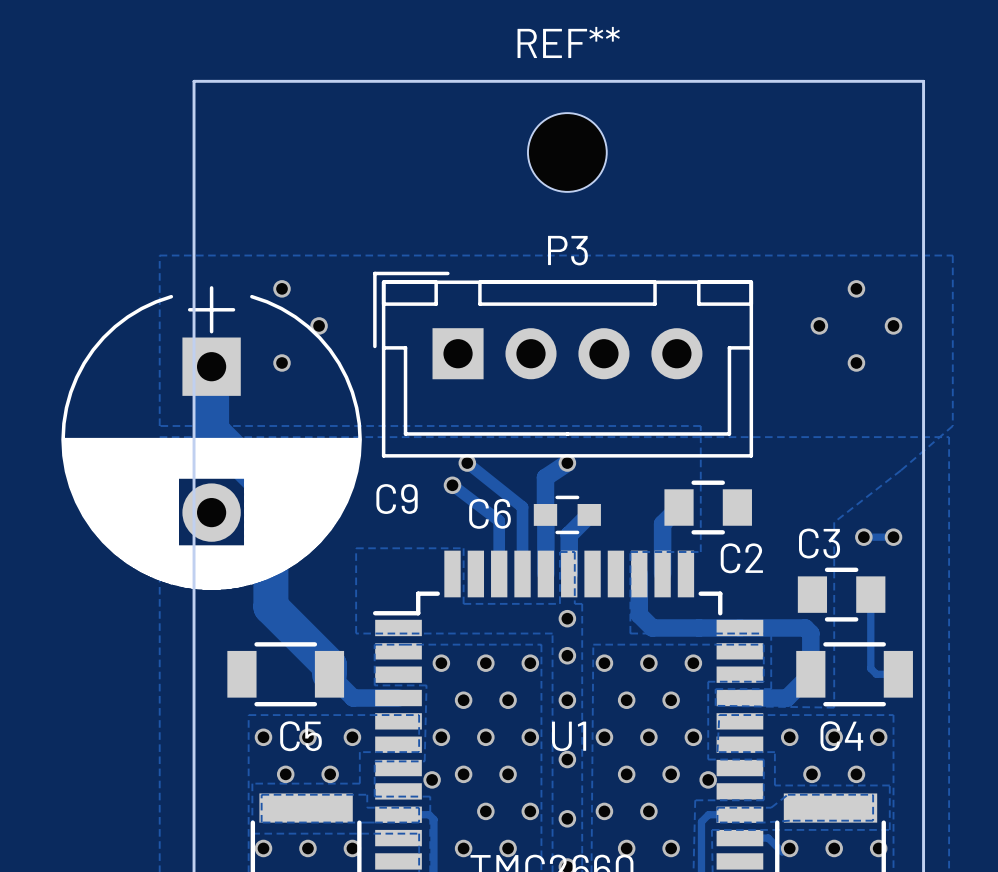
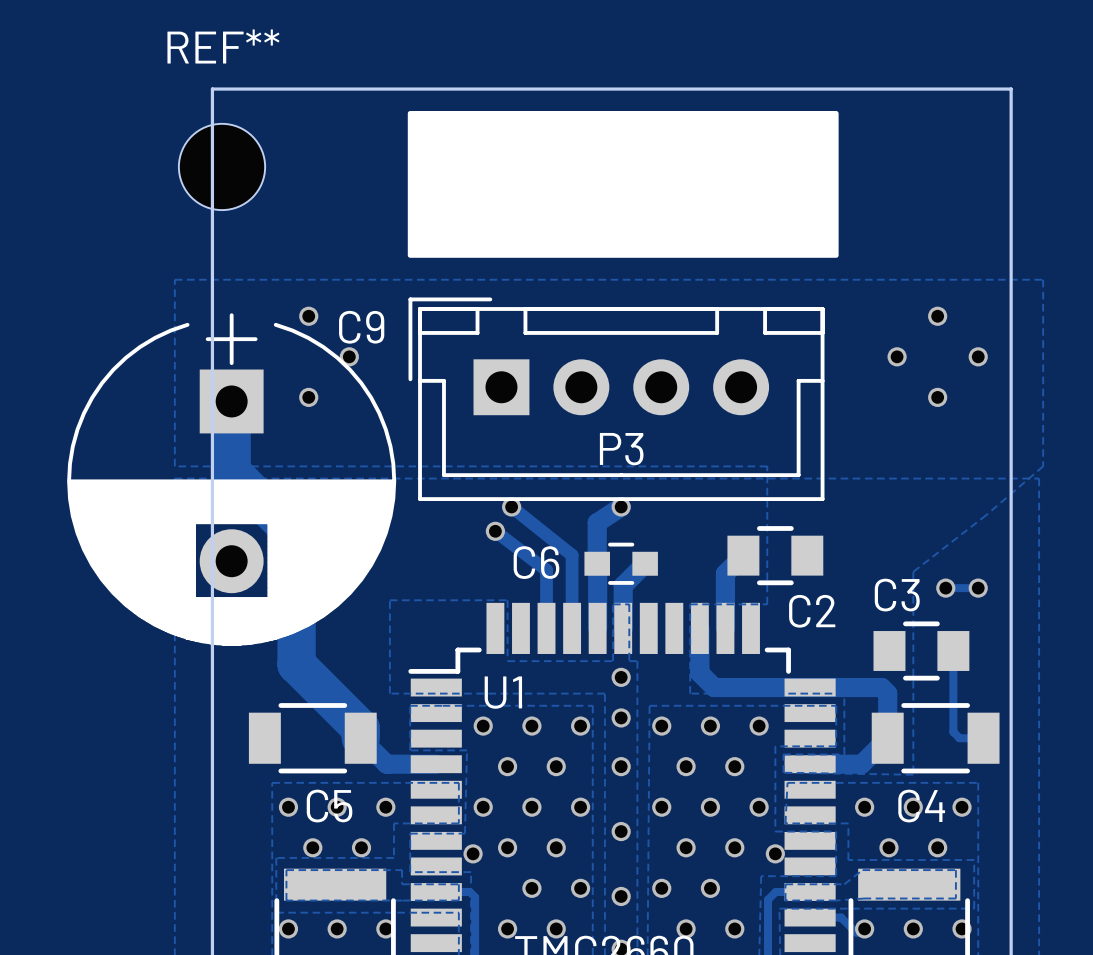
drawing: none -> [407, 110, 839, 258]
REF** position: (567, 152) -> (222, 166)
P3 name position: P3 (567, 250) -> P3 (621, 449)
C9 name position: C9 (397, 499) -> C9 (361, 327)
U1 name position: U1 (569, 736) -> U1 (503, 692)

